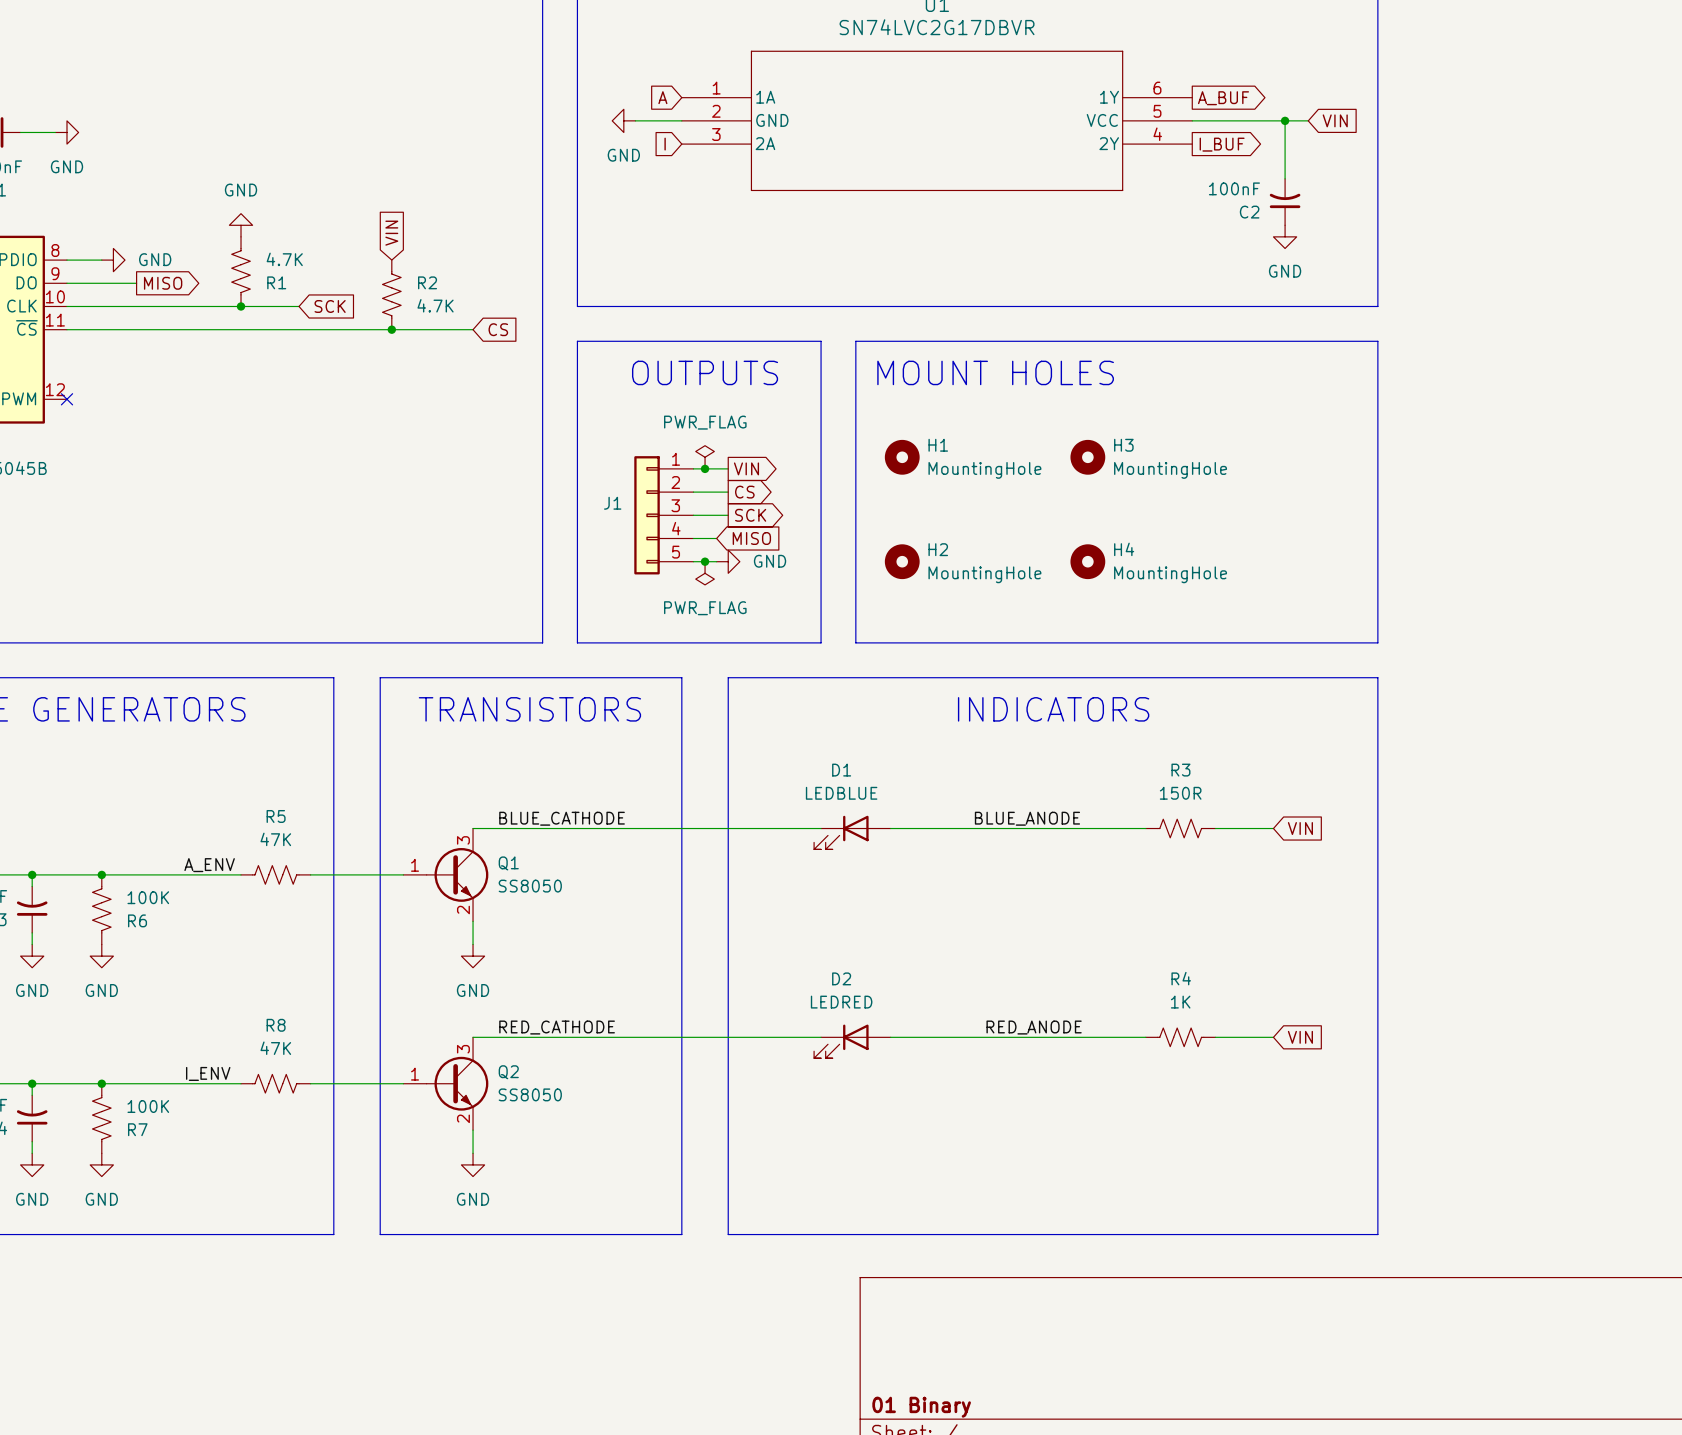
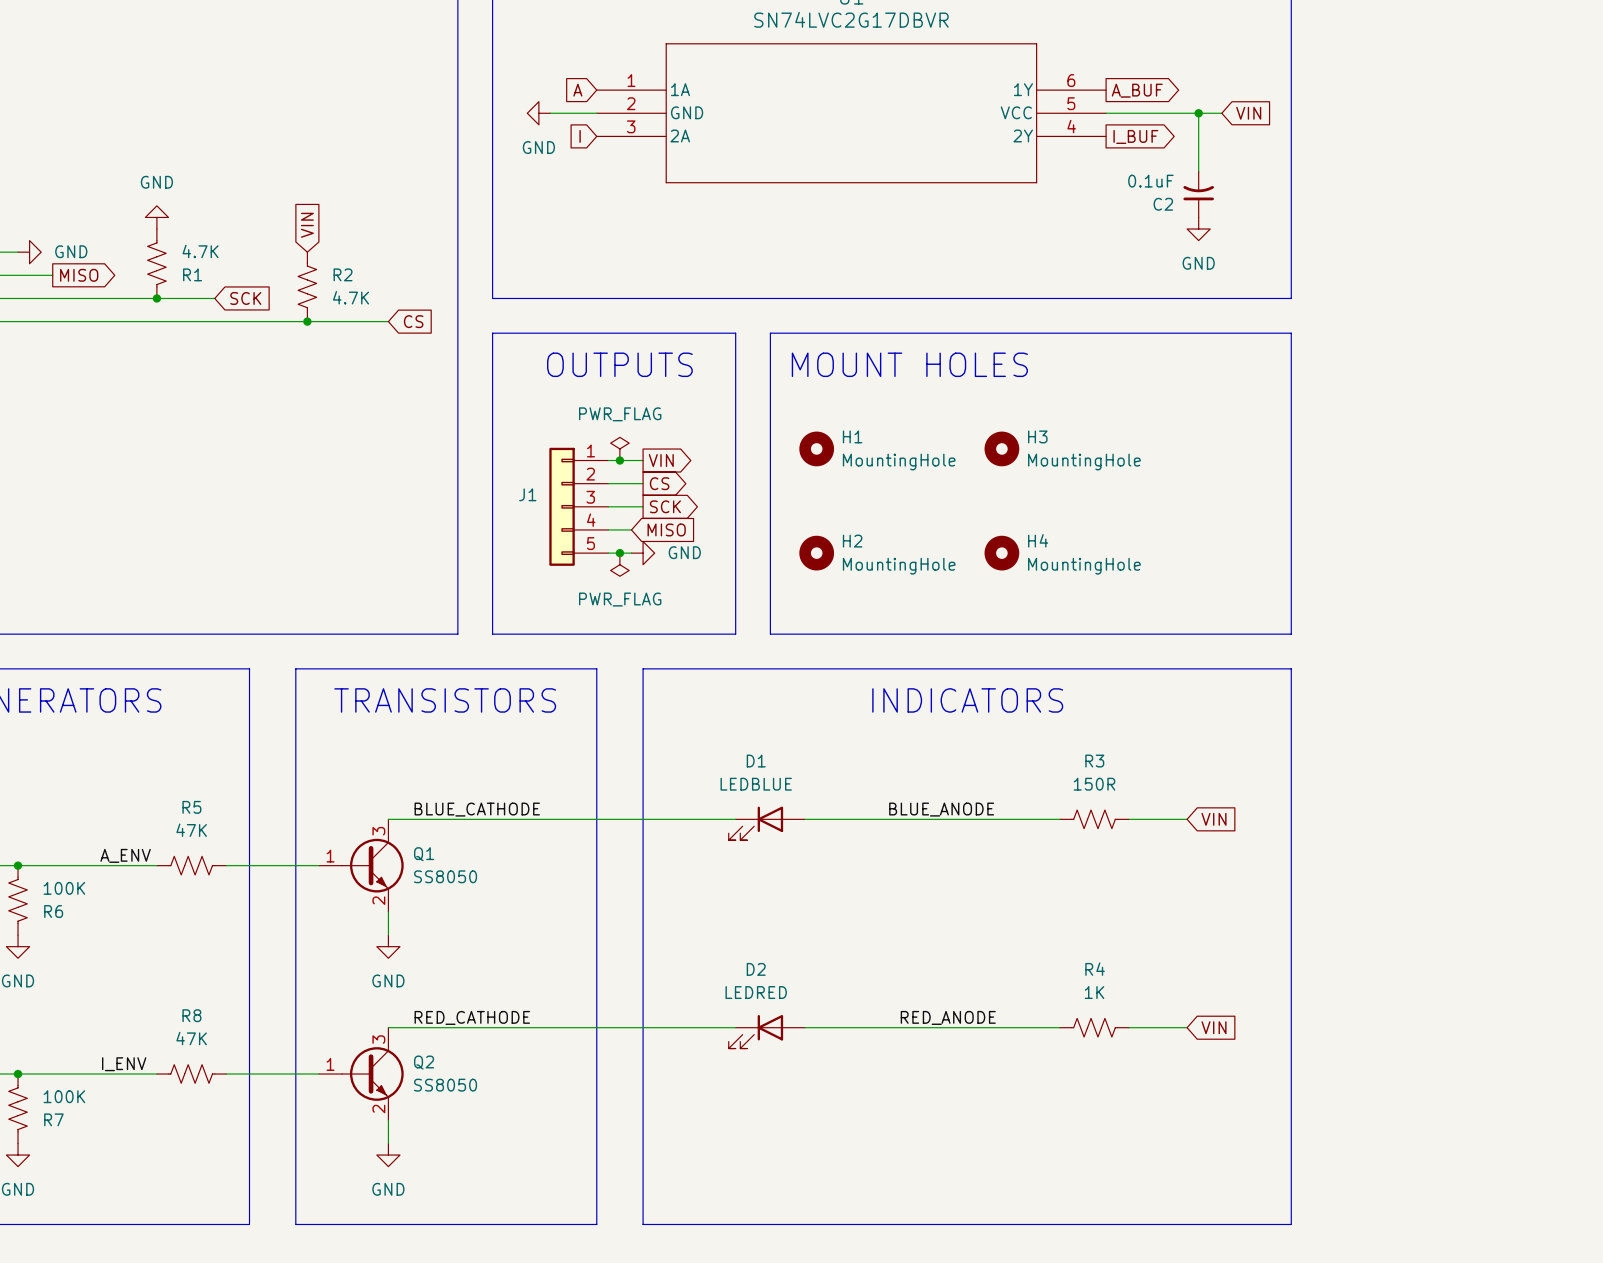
C2 value: 100nF (1234, 188) -> 0.1uF (1150, 181)

